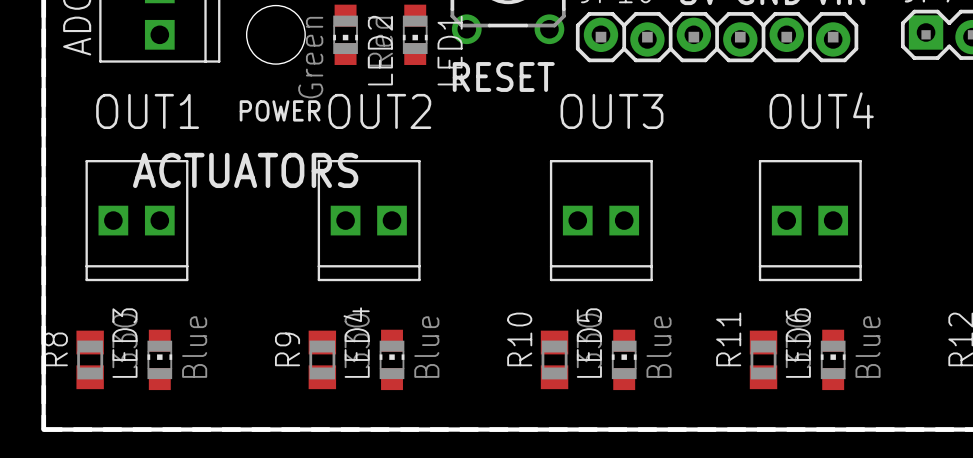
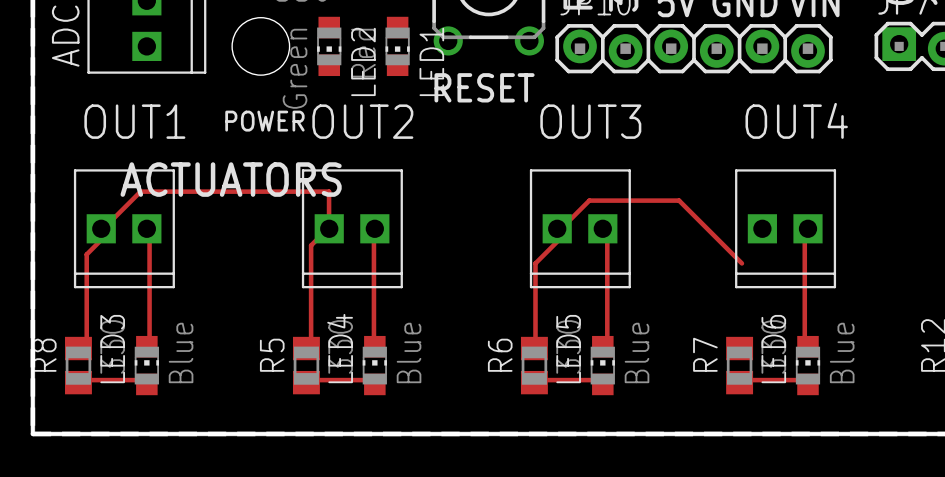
track: none -> (329, 227) (311, 245) (311, 344) (306, 348)
track: none -> (329, 227) (329, 191) (140, 191) (101, 228) (104, 236) (86, 254) (86, 344) (78, 348)
track: none -> (146, 228) (149, 236) (149, 344) (146, 346)
track: none -> (374, 228) (374, 346)
track: none -> (602, 228) (607, 236) (607, 344) (602, 346)
track: none -> (807, 228) (804, 236) (804, 344) (807, 346)
track: none -> (741, 263) (679, 200) (589, 200) (562, 227) (557, 228) (562, 236) (535, 263) (534, 348)
R10 name: R10 (519, 339) -> R6 (500, 355)
R11 name: R11 (728, 339) -> R7 (705, 354)
R9 name: R9 (287, 349) -> R5 (272, 355)
track: none -> (78, 382) (86, 380) (140, 380) (146, 384)
track: none -> (306, 382) (311, 380) (373, 380) (374, 384)
track: none -> (534, 382) (535, 380) (598, 380) (602, 384)
track: none -> (739, 382) (741, 380) (804, 380) (807, 384)

